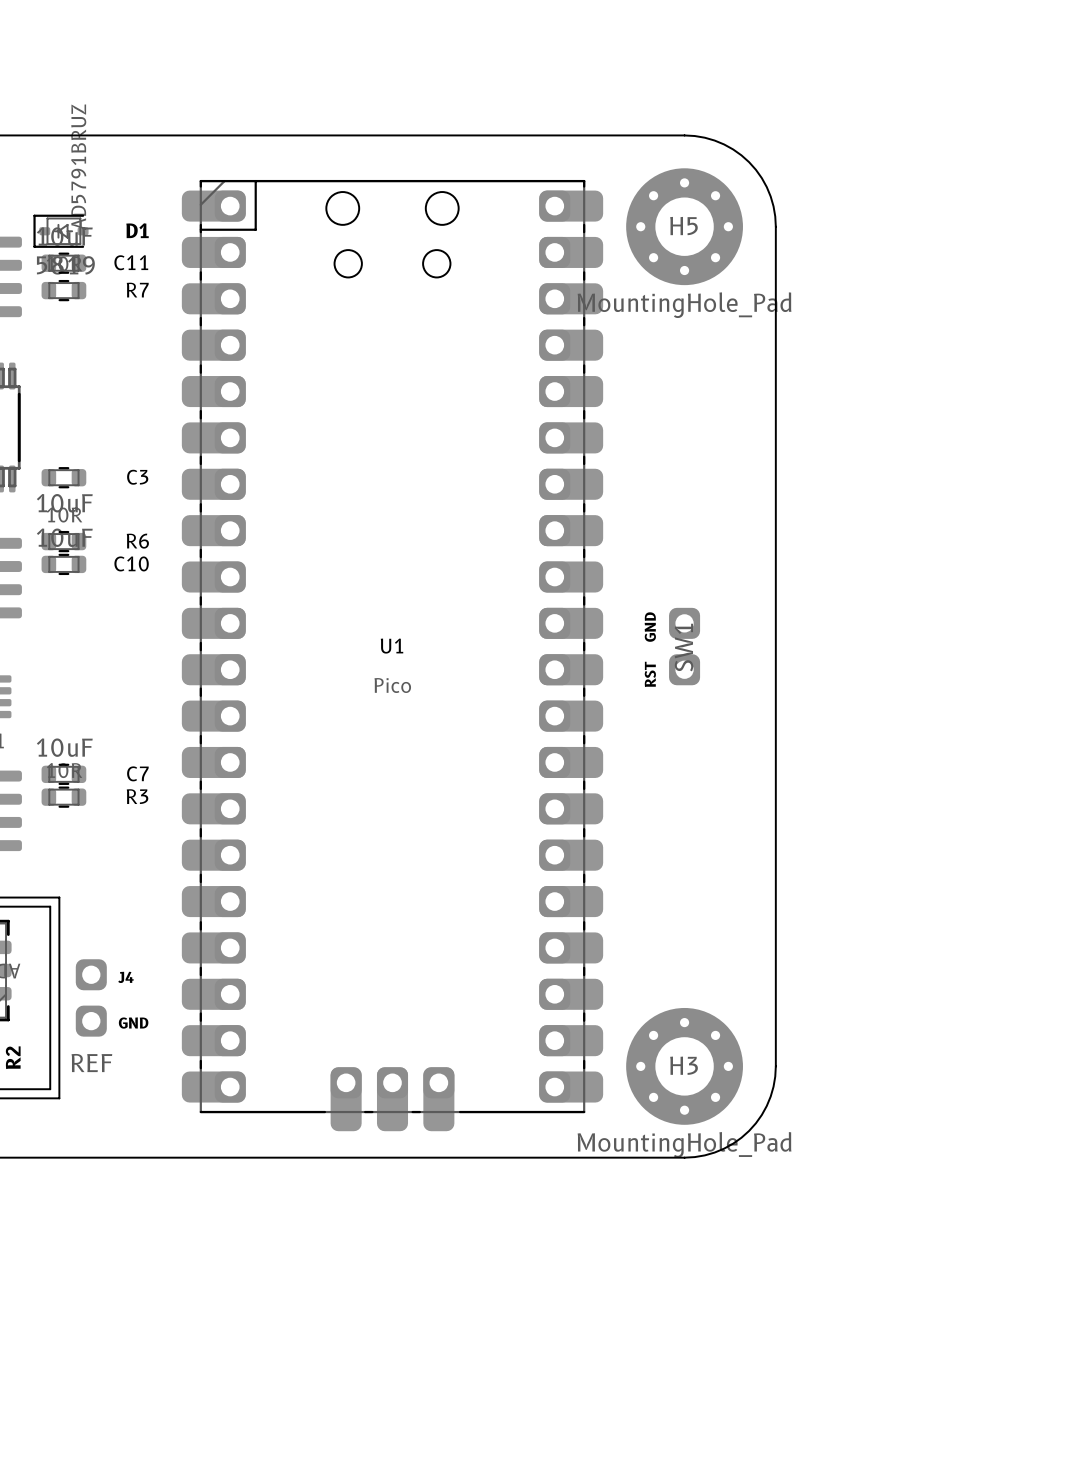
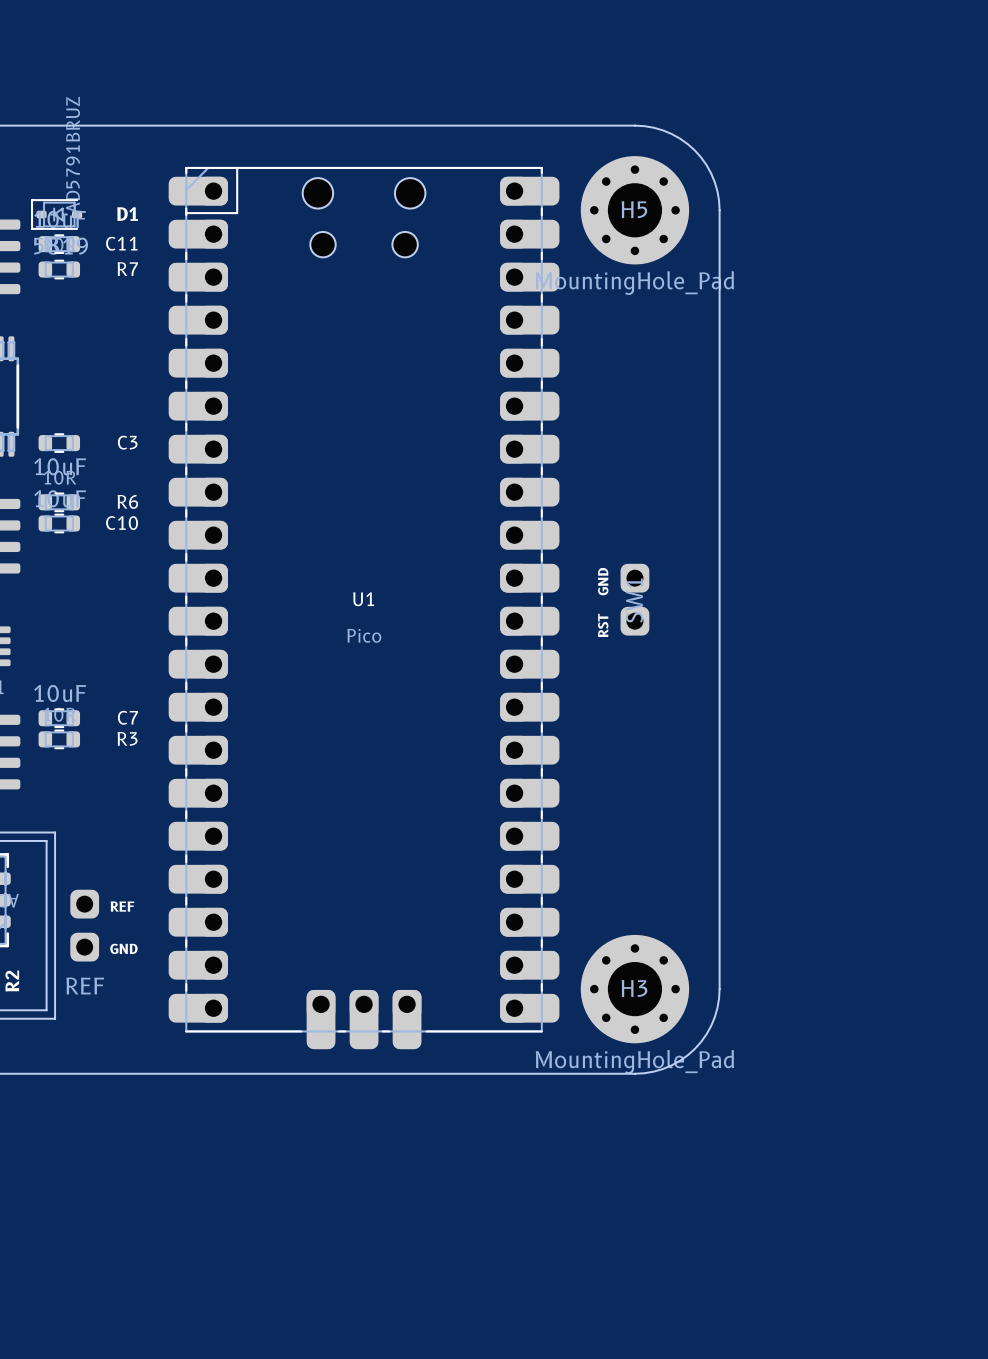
J4 name: J4 (125, 977) -> REF (122, 906)

